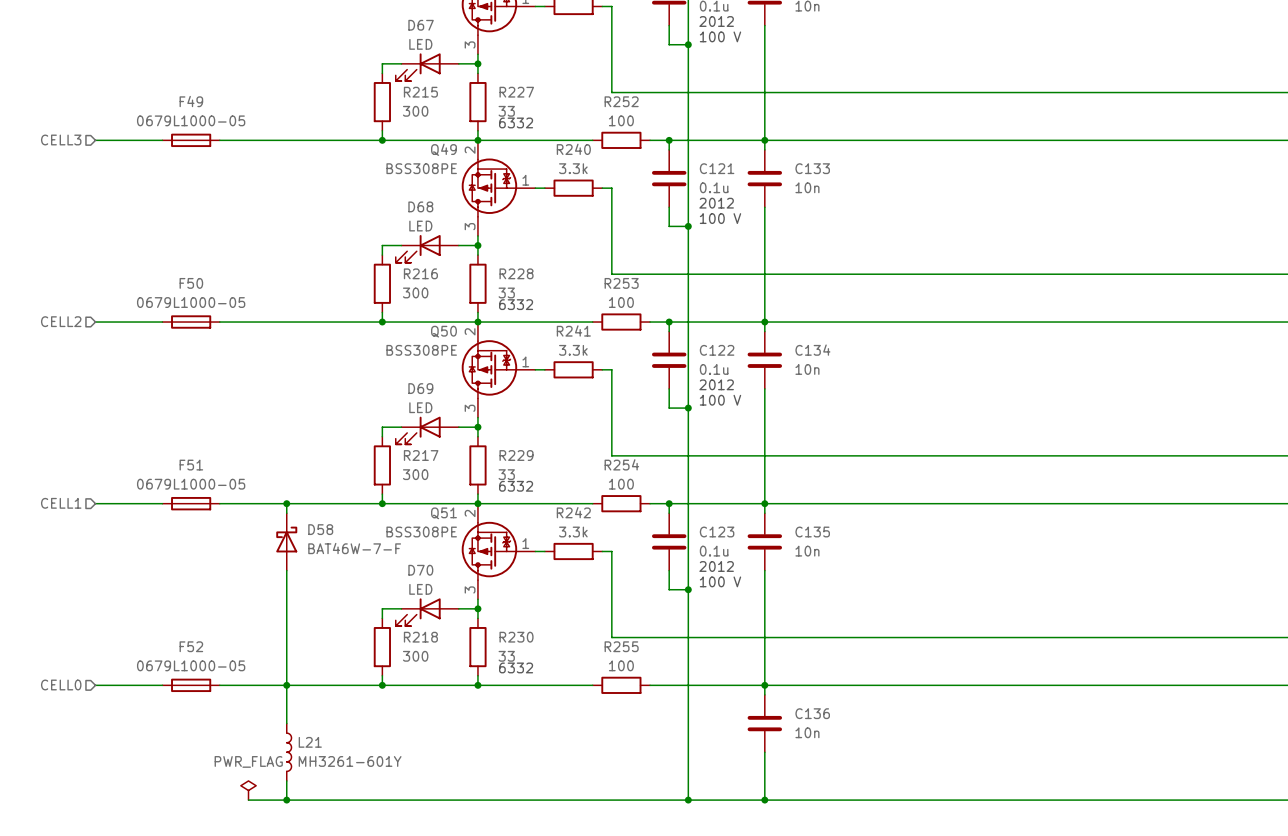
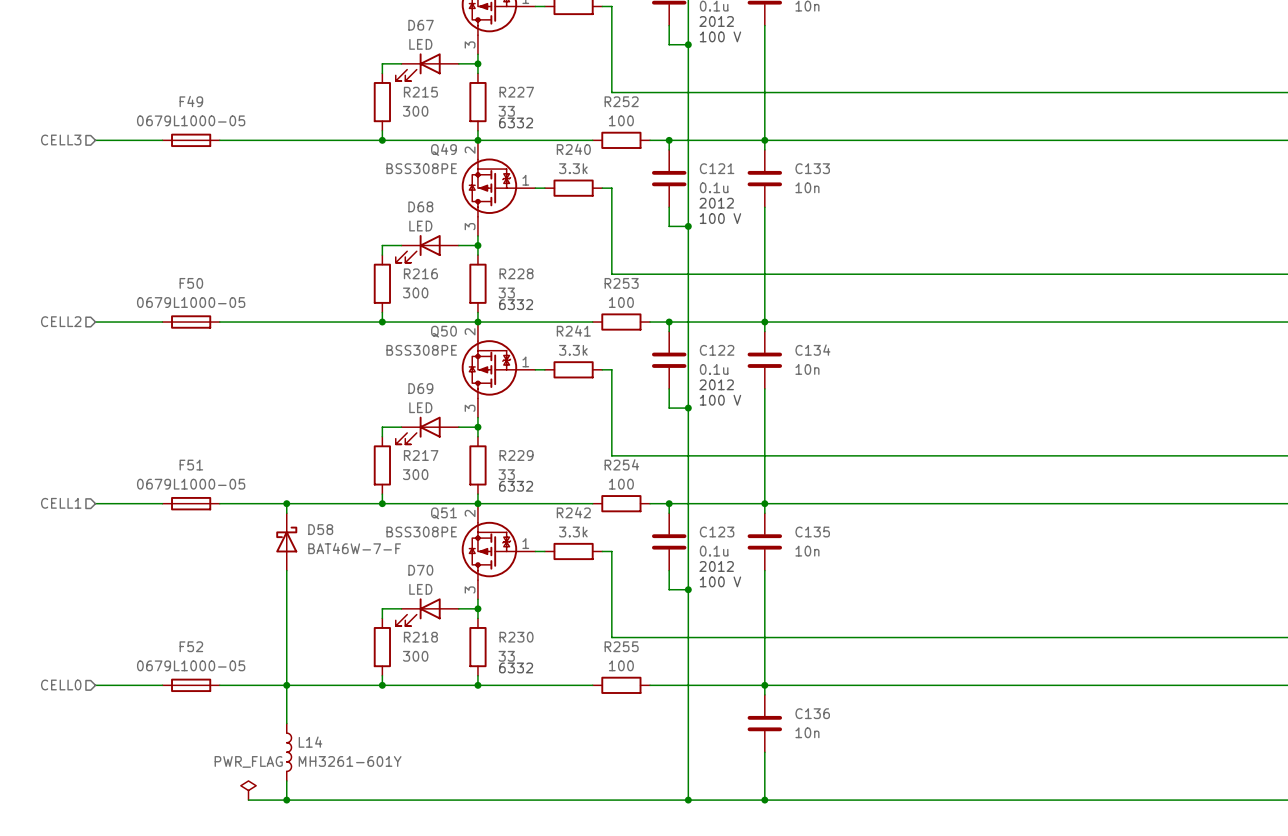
L21 name: L21 (310, 742) -> L14 (310, 742)

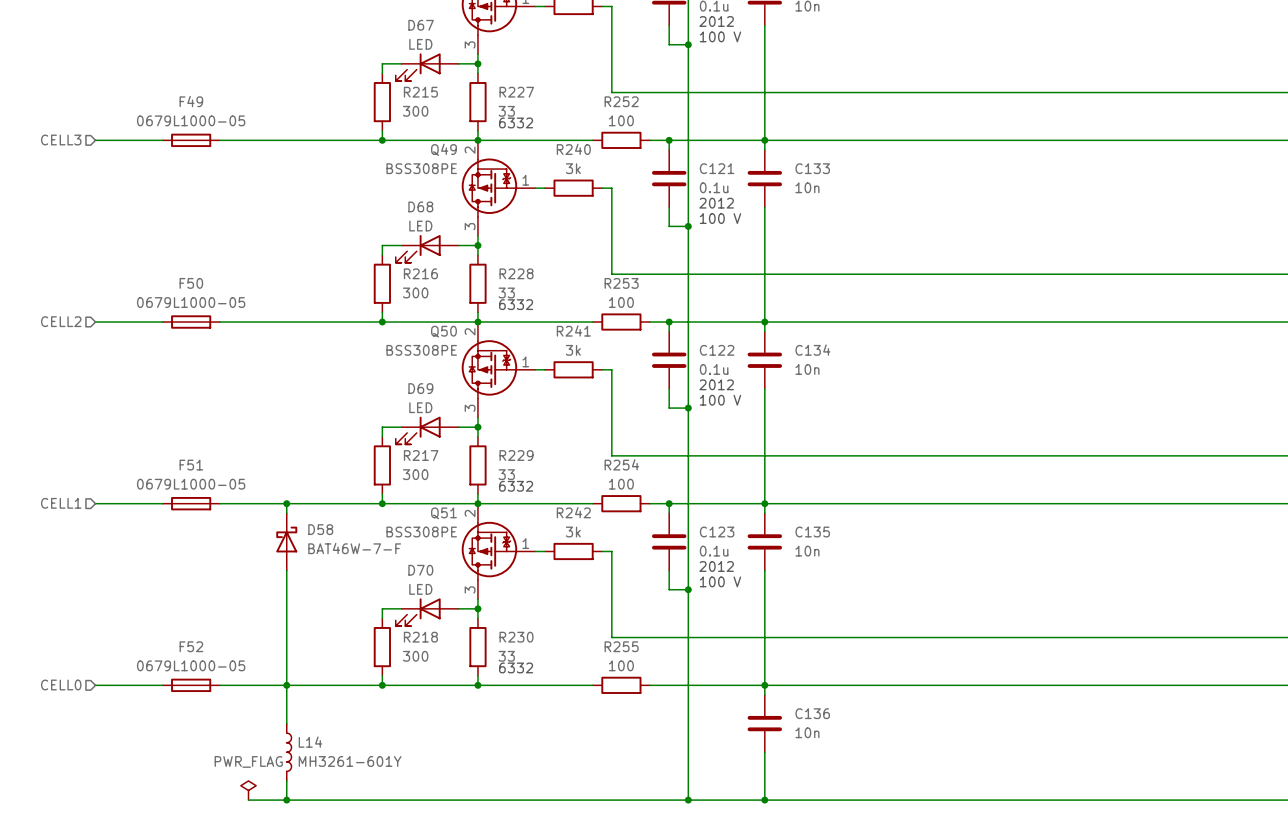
R240 value: 3.3k (573, 168) -> 3k (573, 168)
R241 value: 3.3k (573, 350) -> 3k (573, 350)
R242 value: 3.3k (573, 532) -> 3k (573, 532)

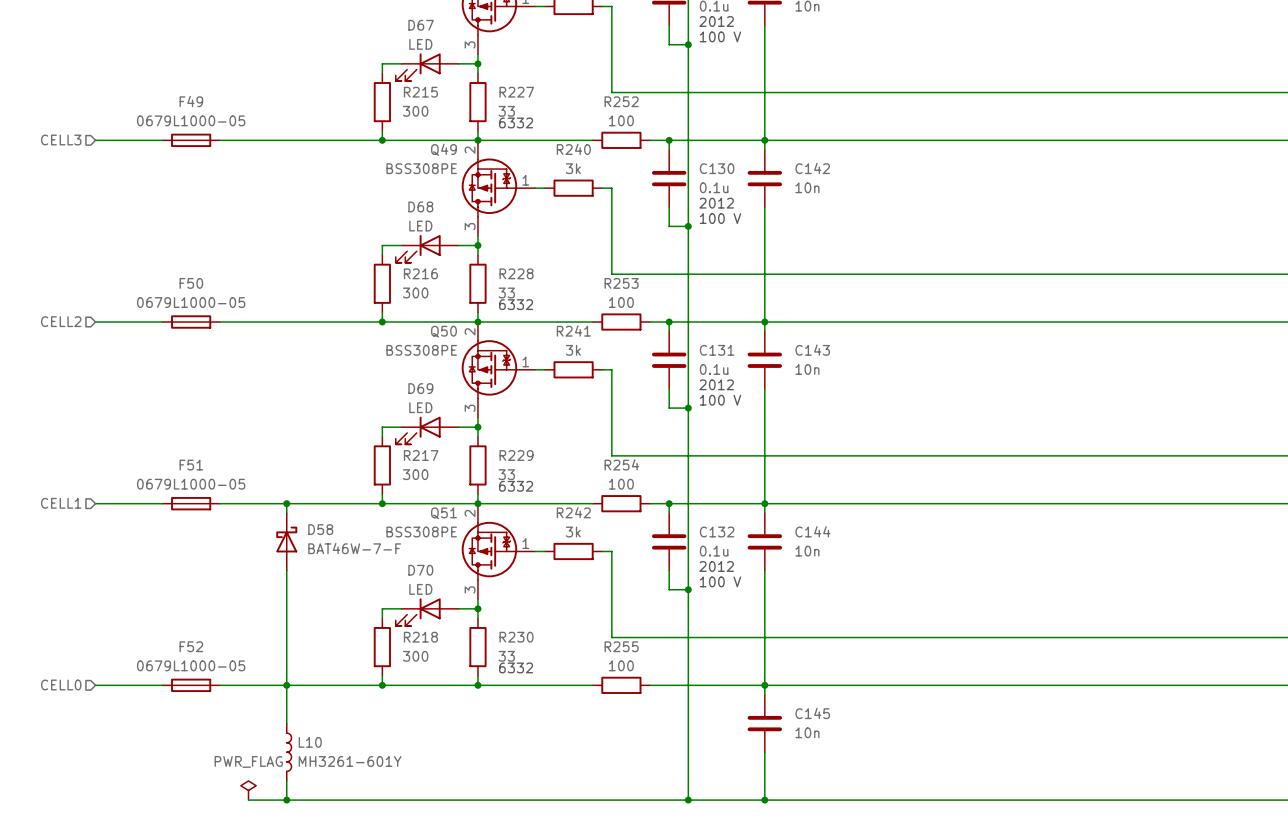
C121 name: C121 (717, 168) -> C130 (717, 168)
C133 name: C133 (812, 168) -> C142 (812, 168)
C122 name: C122 (717, 350) -> C131 (717, 350)
C134 name: C134 (812, 350) -> C143 (812, 350)
C123 name: C123 (717, 532) -> C132 (717, 532)
C135 name: C135 (812, 532) -> C144 (812, 531)
C136 name: C136 (812, 713) -> C145 (812, 713)
L14 name: L14 (310, 742) -> L10 (310, 742)

